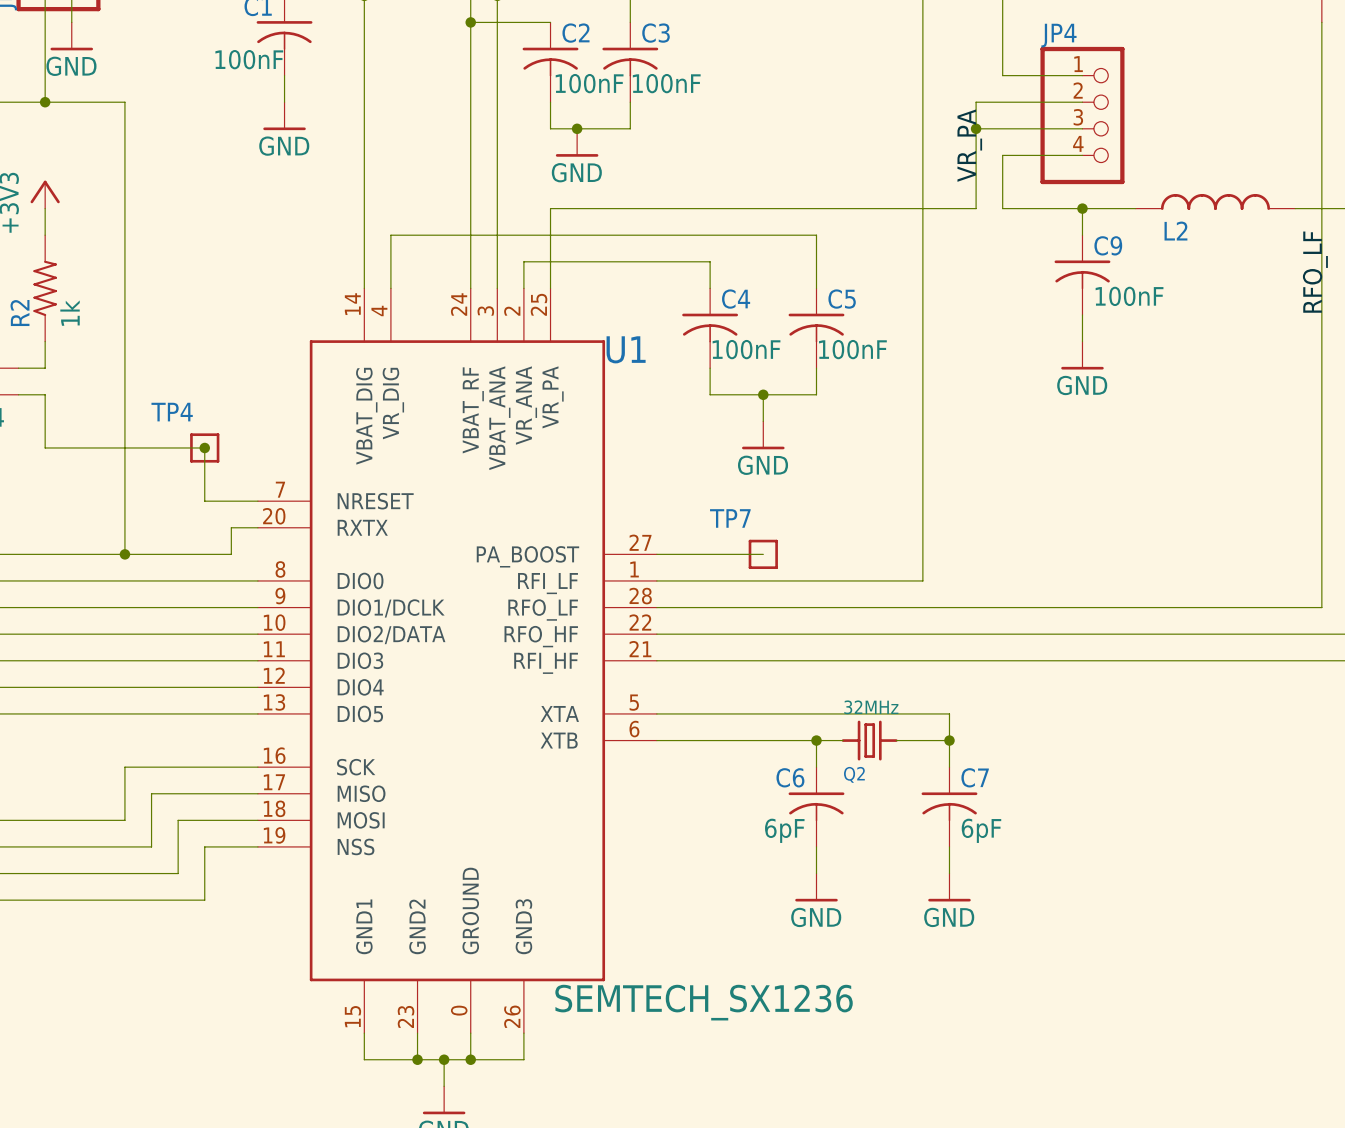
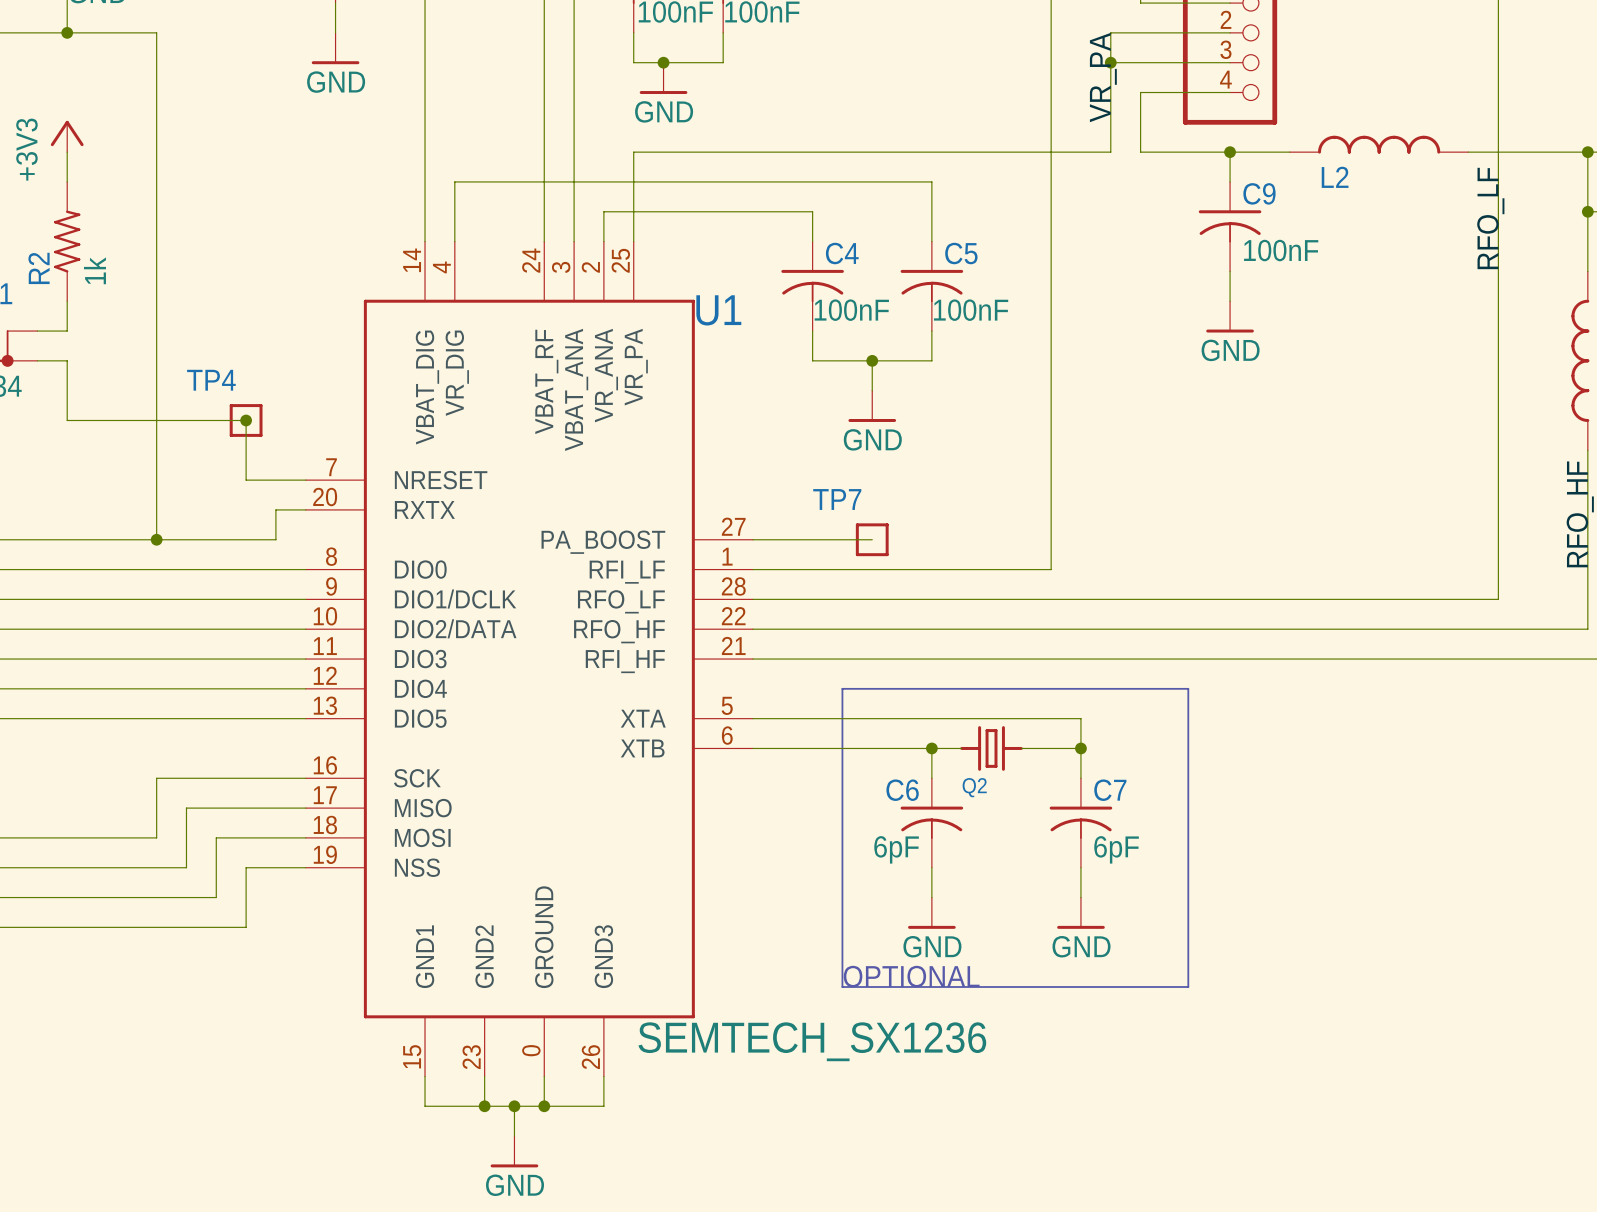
line: none -> (842, 688) (842, 987) (1188, 987) (1188, 688) (842, 688)
Q2 value: 32MHz (871, 707) -> none
text: none -> OPTIONAL (911, 976)

